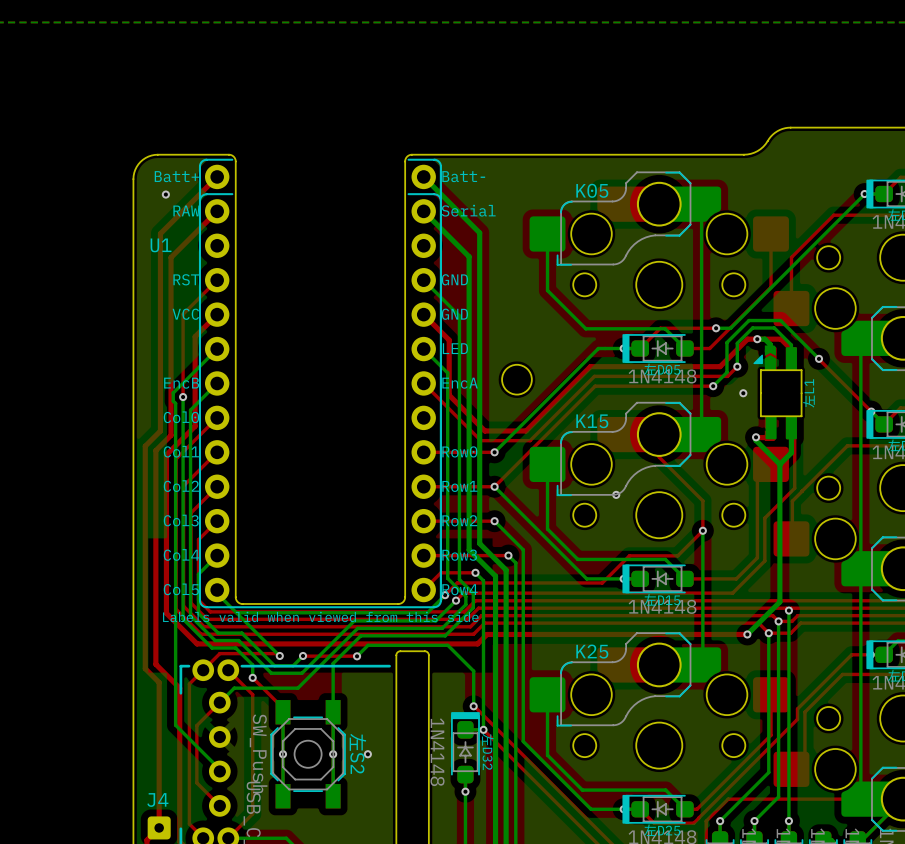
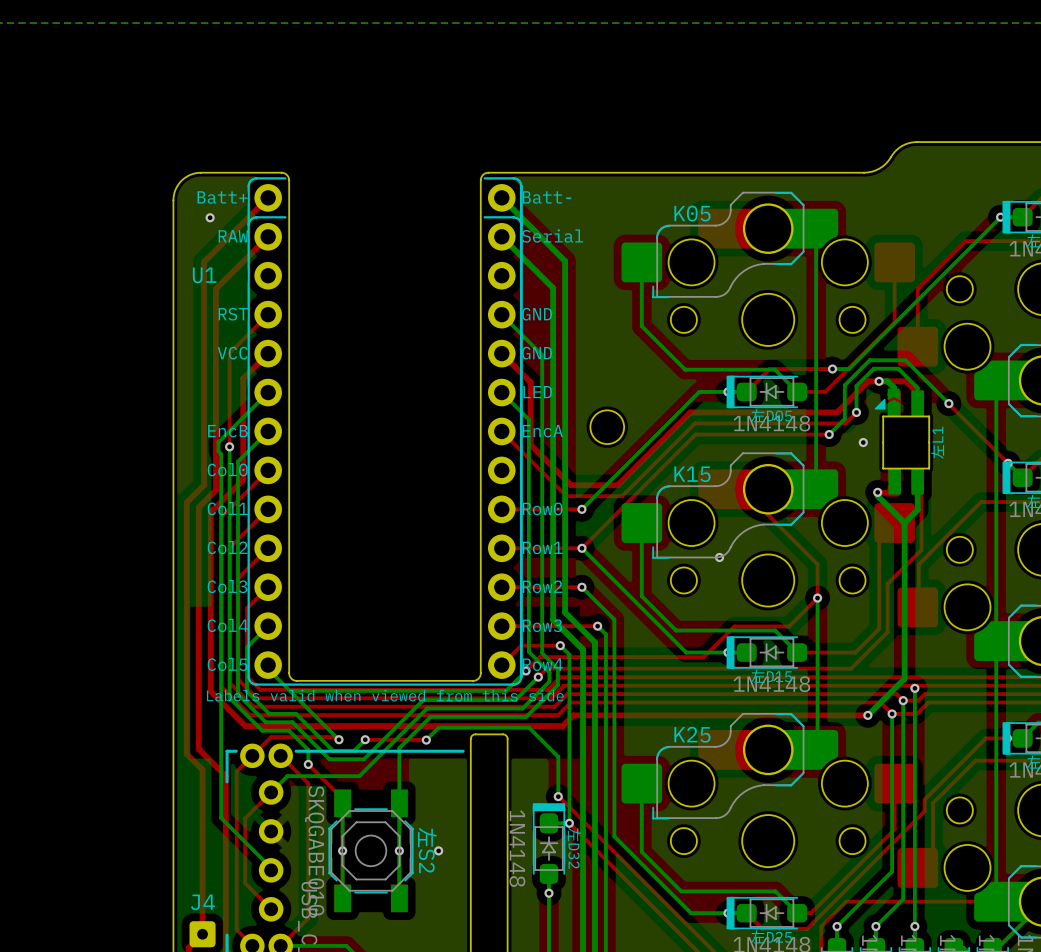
左S2 value: SW_Push (258, 753) -> SKQGABE010 (314, 850)
J4 name: none -> J4 (202, 902)
text: J4 (157, 800) -> none

